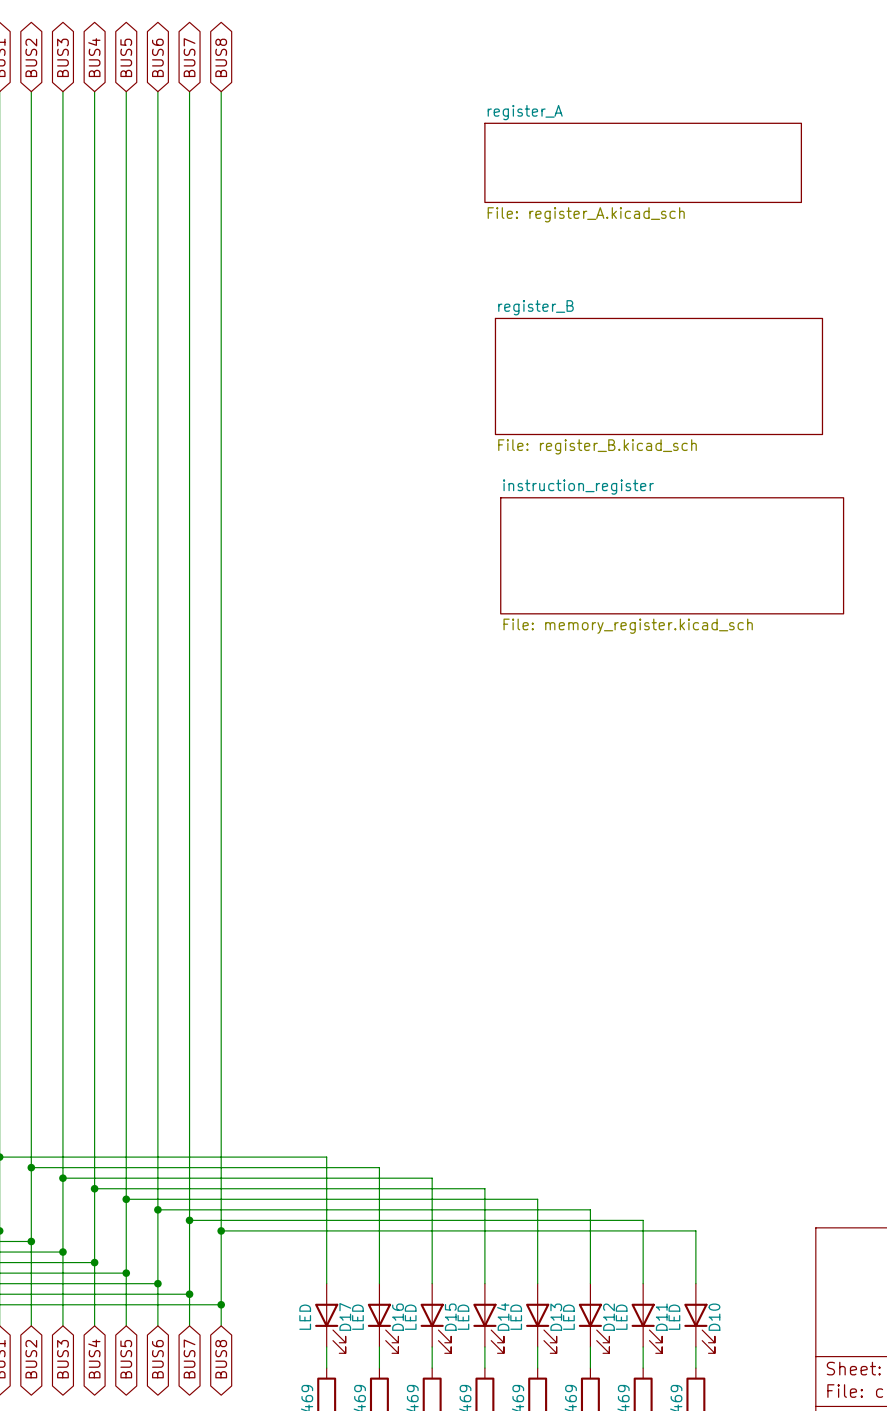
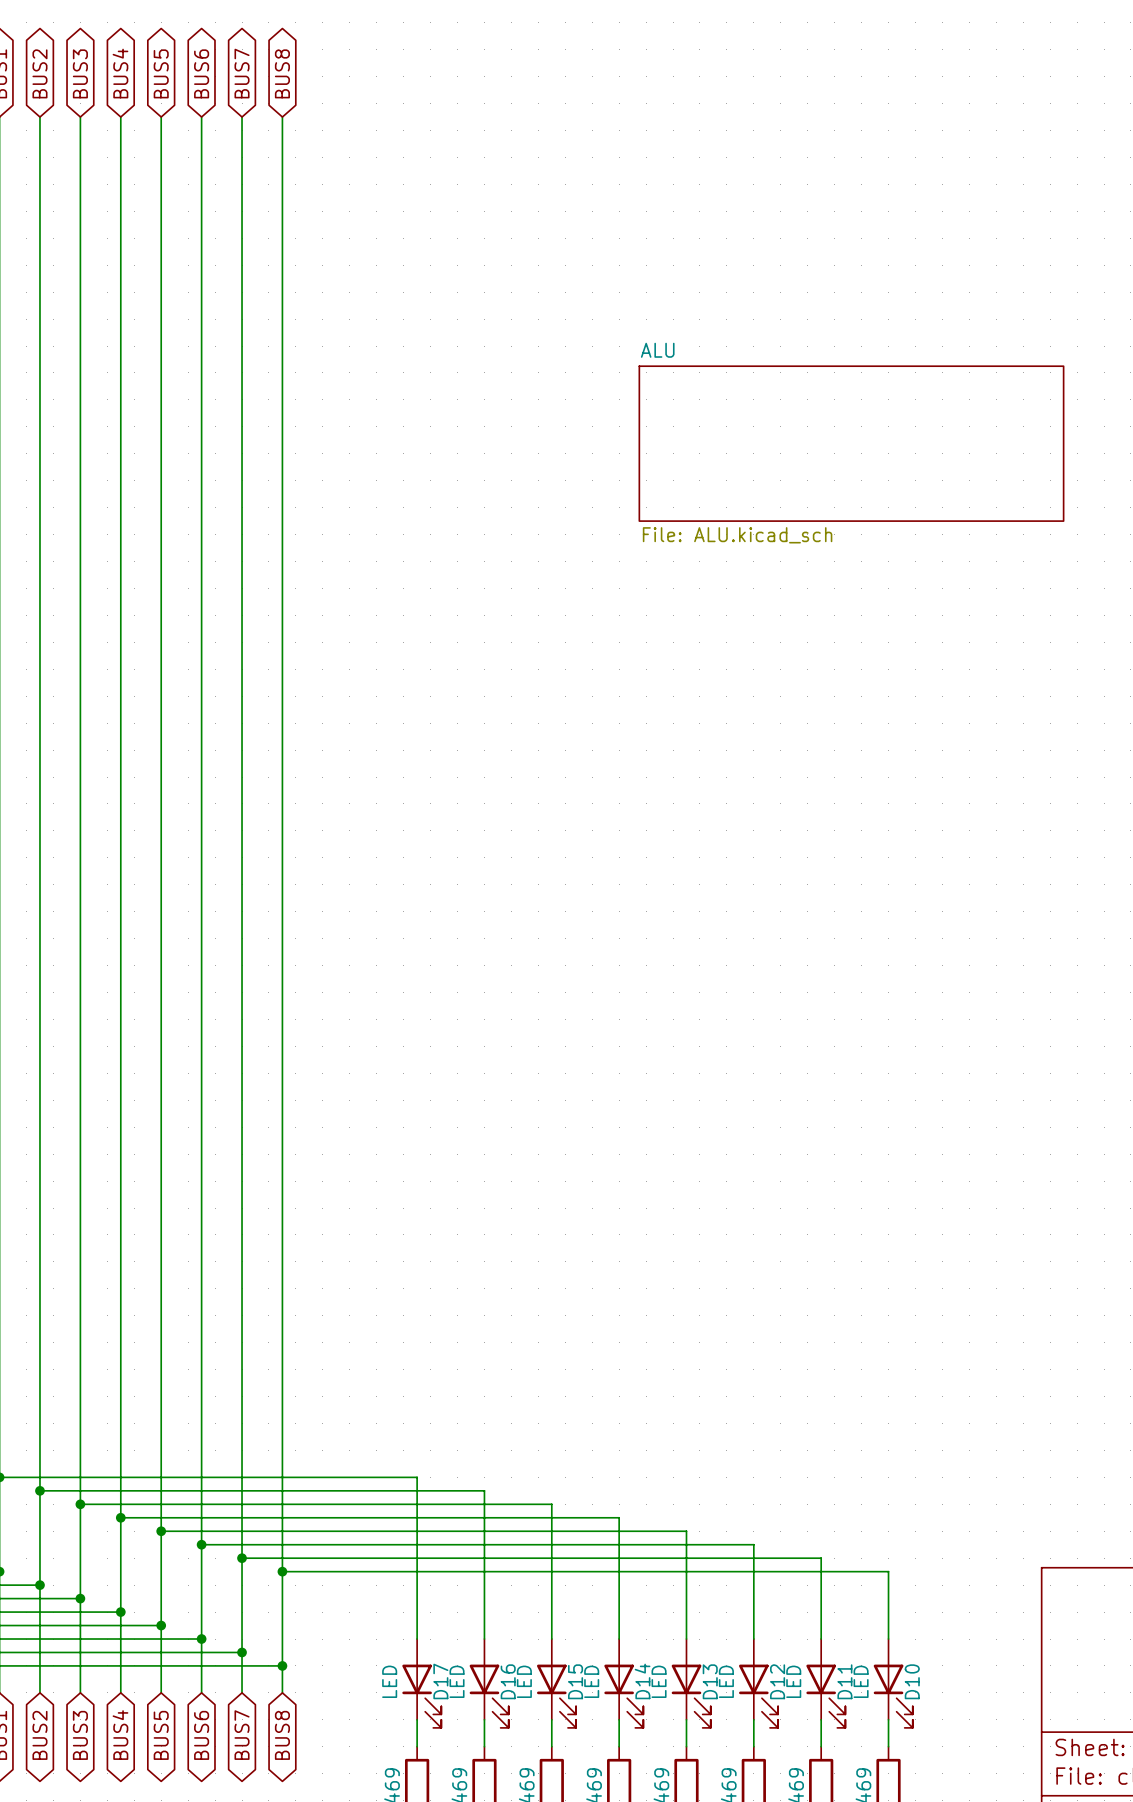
sheet register_A: File: register_A.kicad_sch (643, 162) -> none
sheet ALU: none -> File: ALU.kicad_sch (851, 443)
sheet register_B: File: register_B.kicad_sch (658, 376) -> none
sheet instruction_register: File: memory_register.kicad_sch (672, 555) -> none

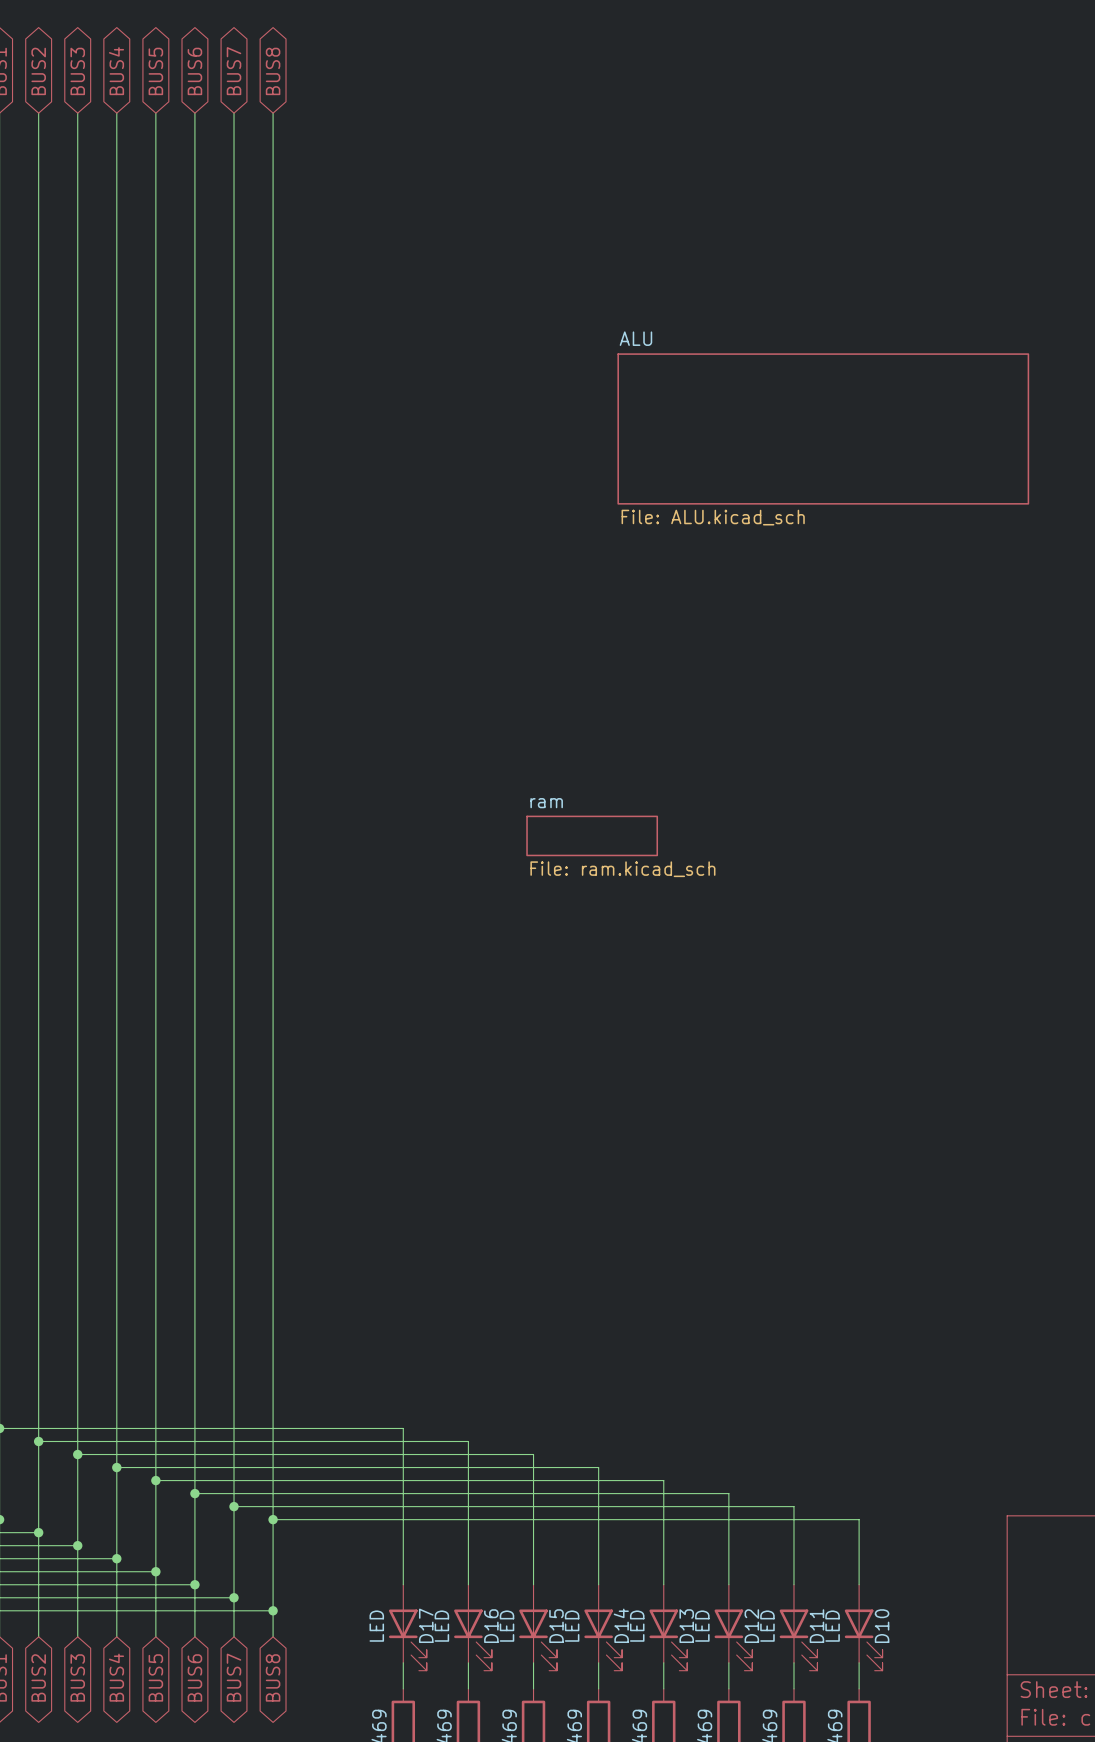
sheet ram: none -> File: ram.kicad_sch (592, 835)

